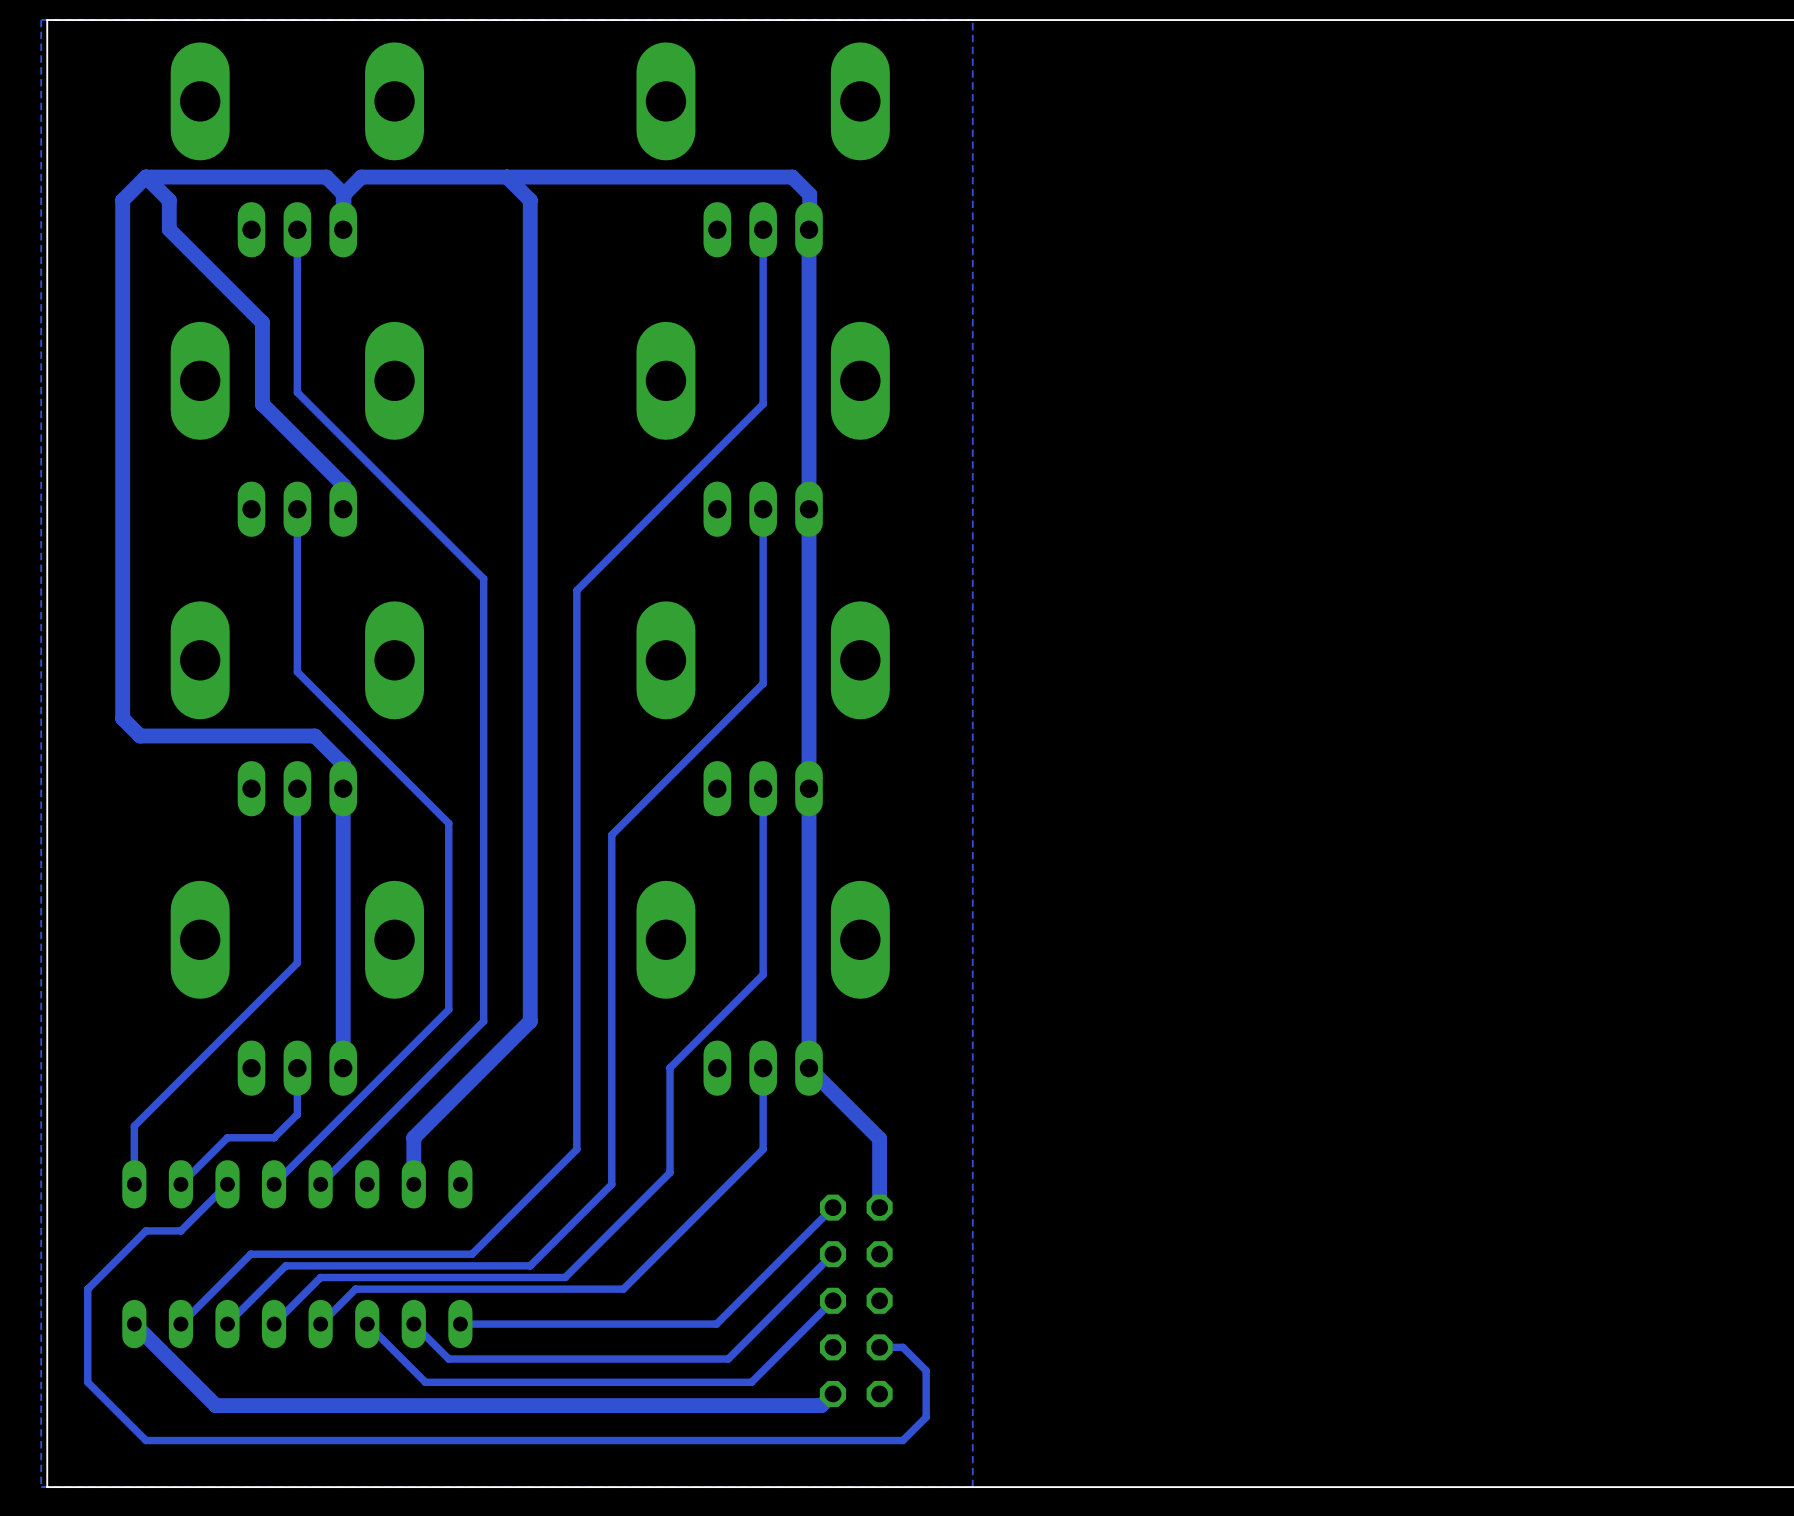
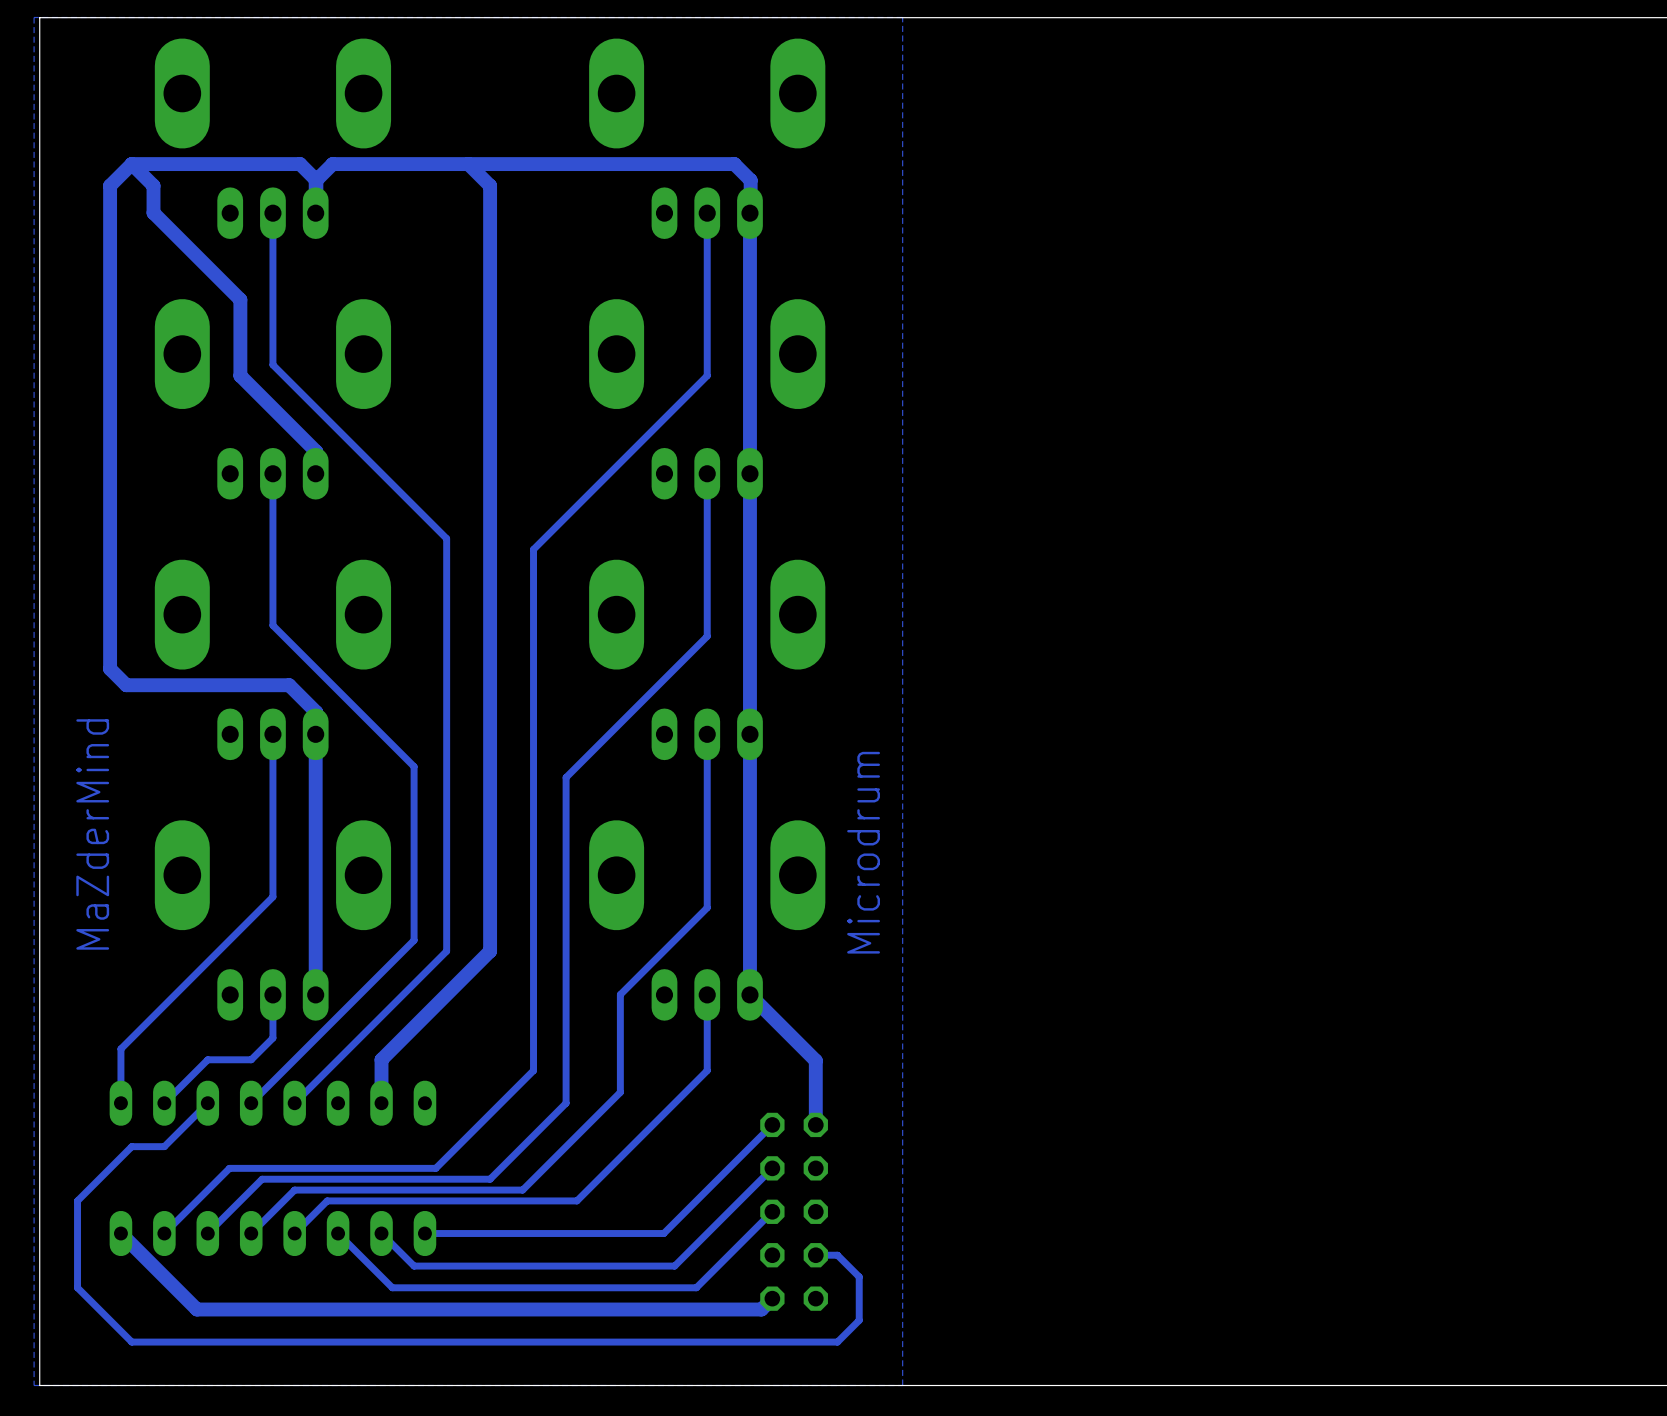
text: none -> MaZderMind (92, 834)
text: none -> Microdrum (863, 852)

